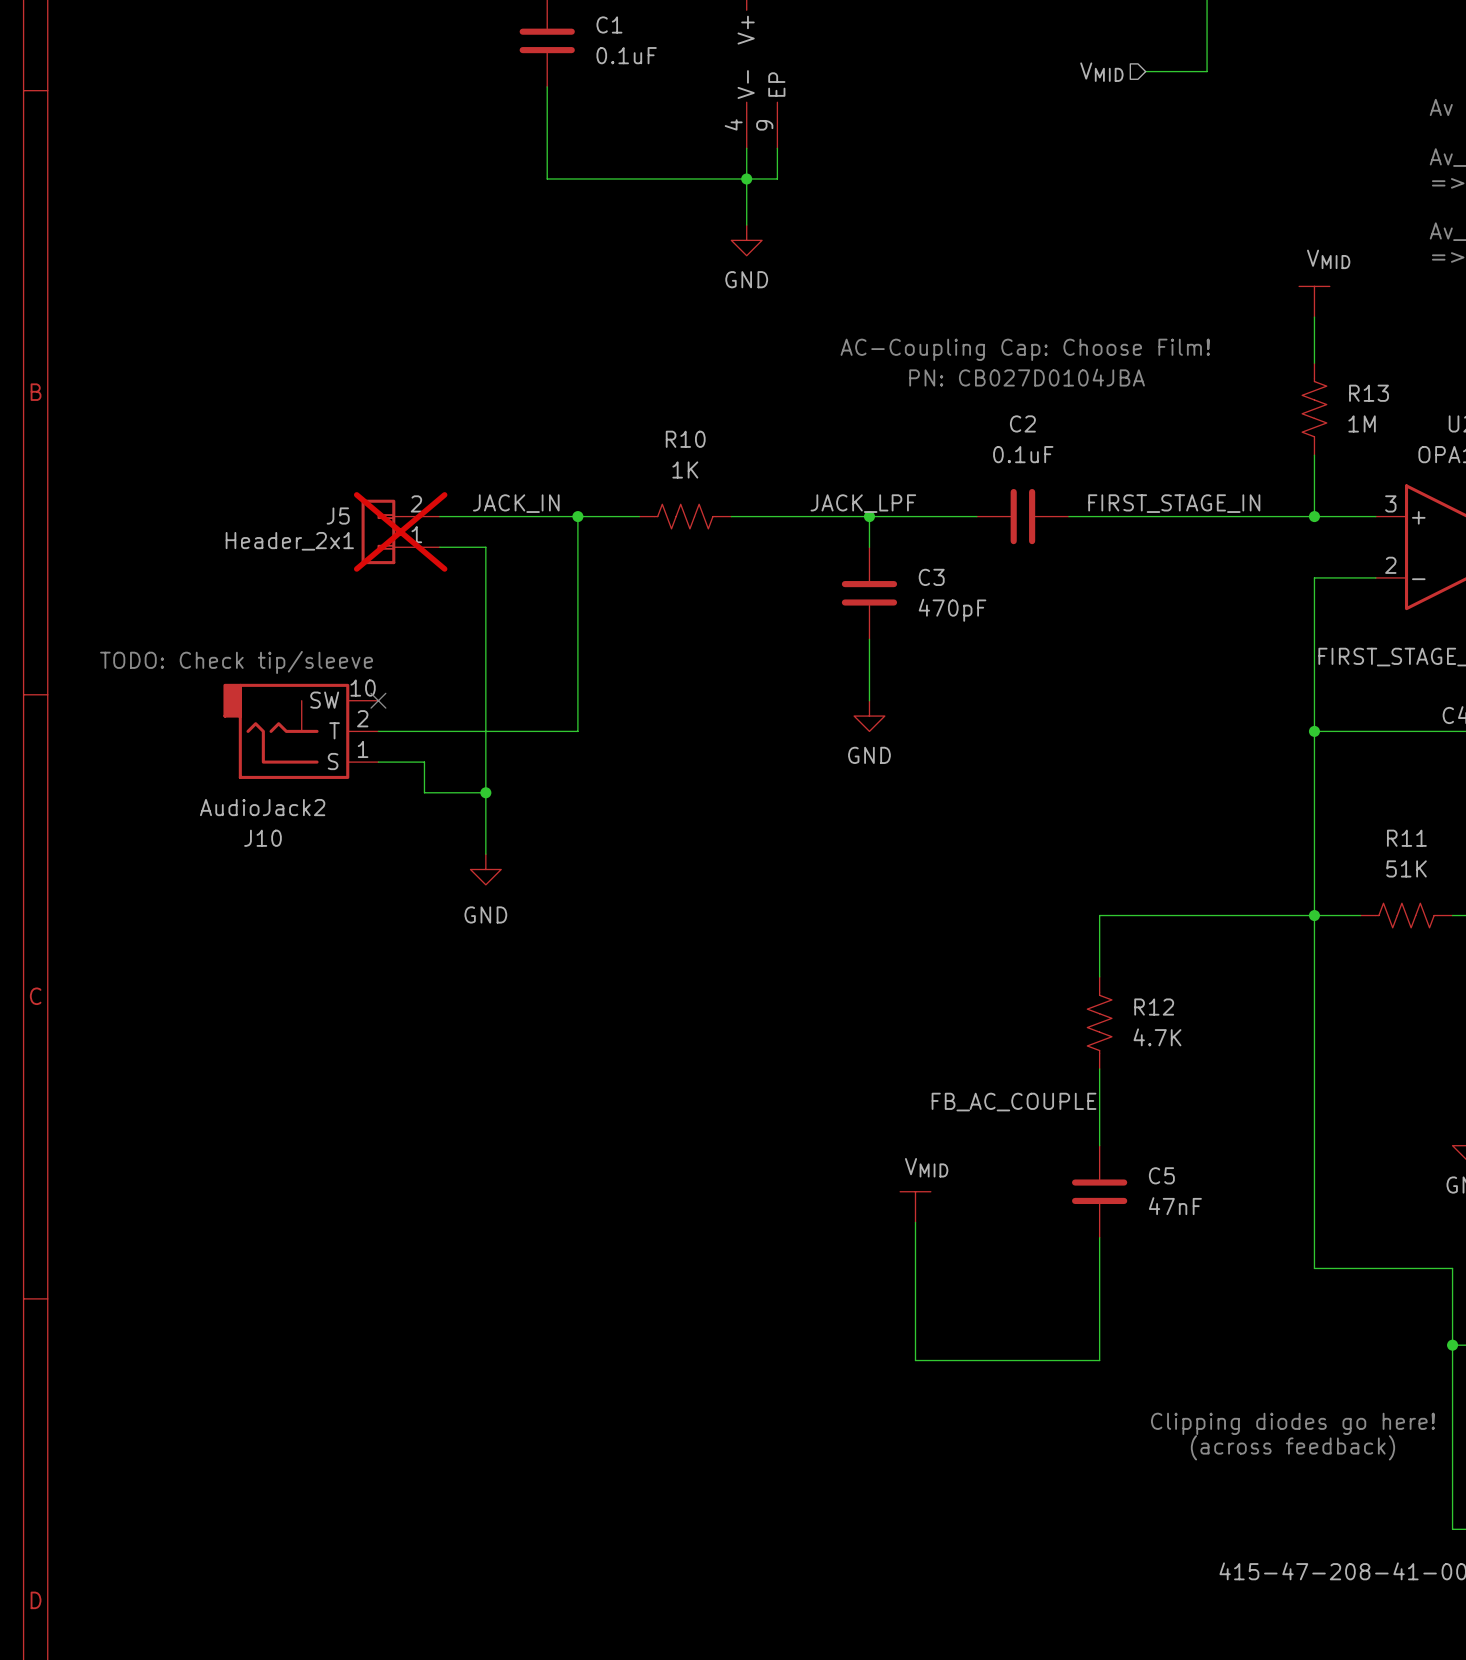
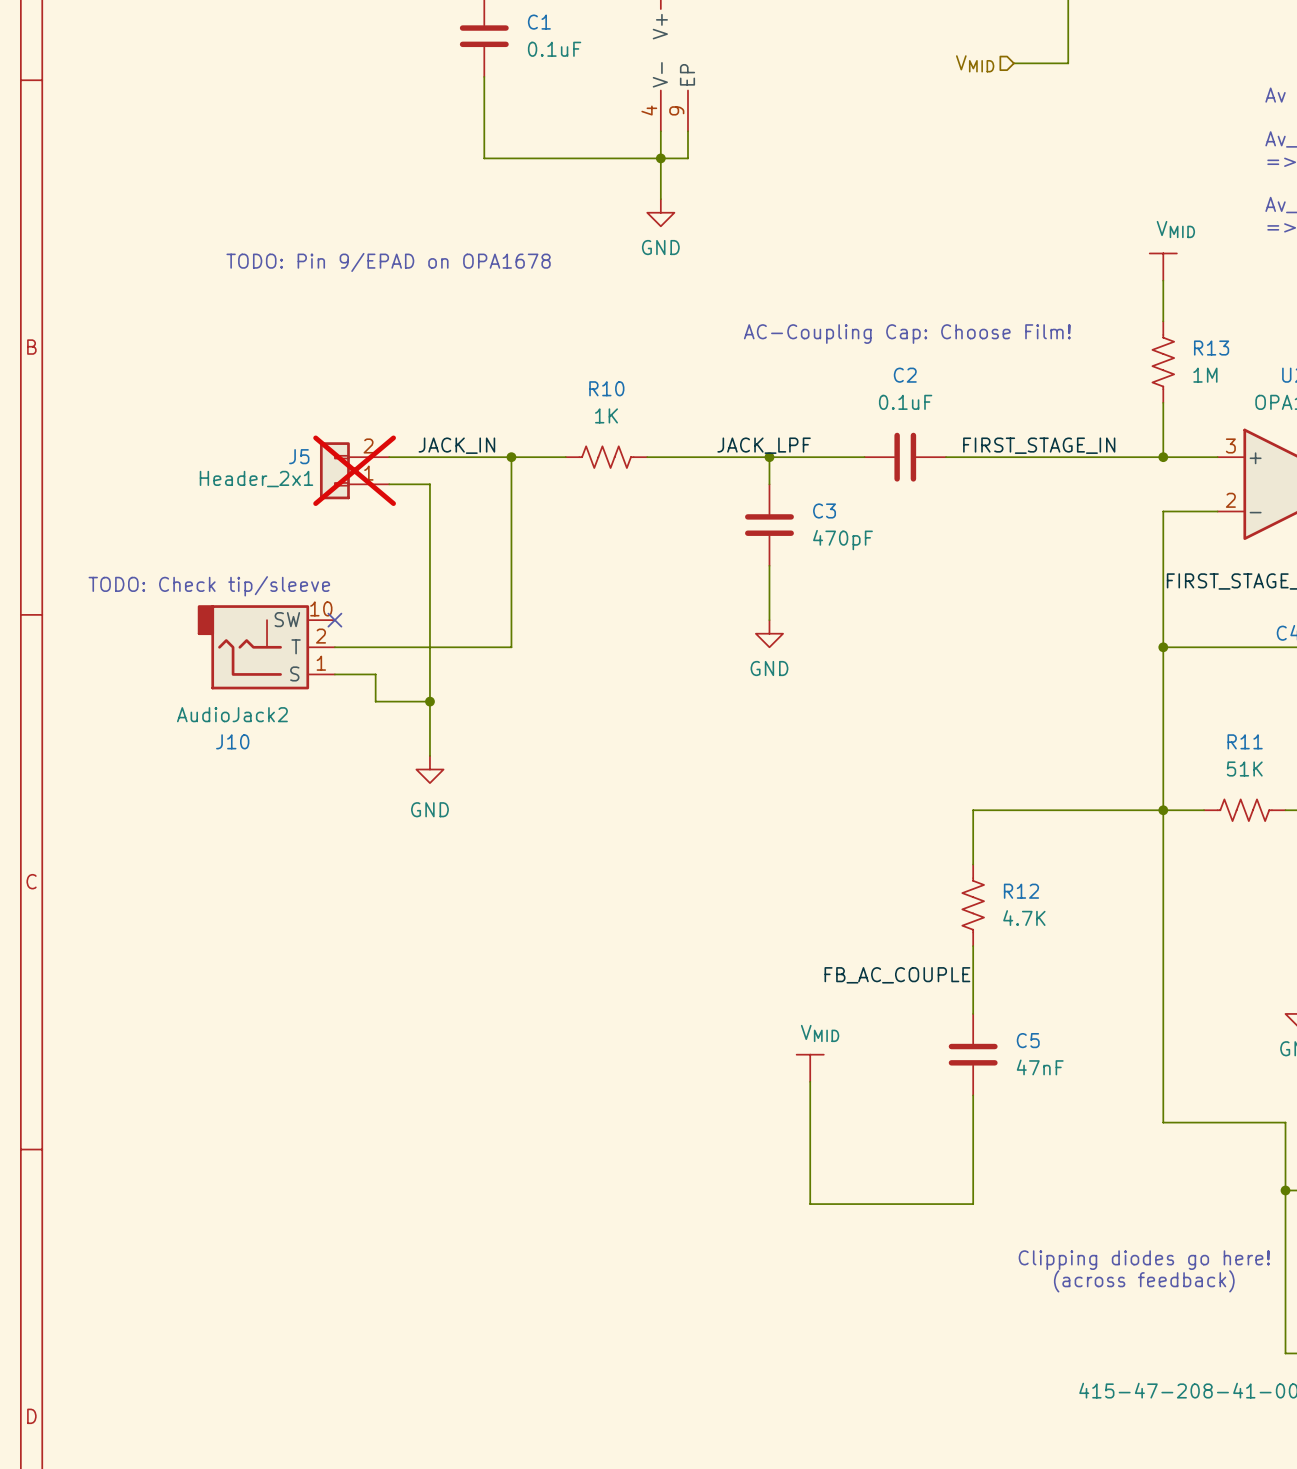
text: none -> TODO: Pin 9/EPAD on OPA1678 (388, 262)
text: AC-Coupling Cap: Choose Film! (1025, 349) -> none
text: PN: CB027D0104JBA (1027, 377) -> AC-Coupling Cap: Choose Film! (907, 334)

